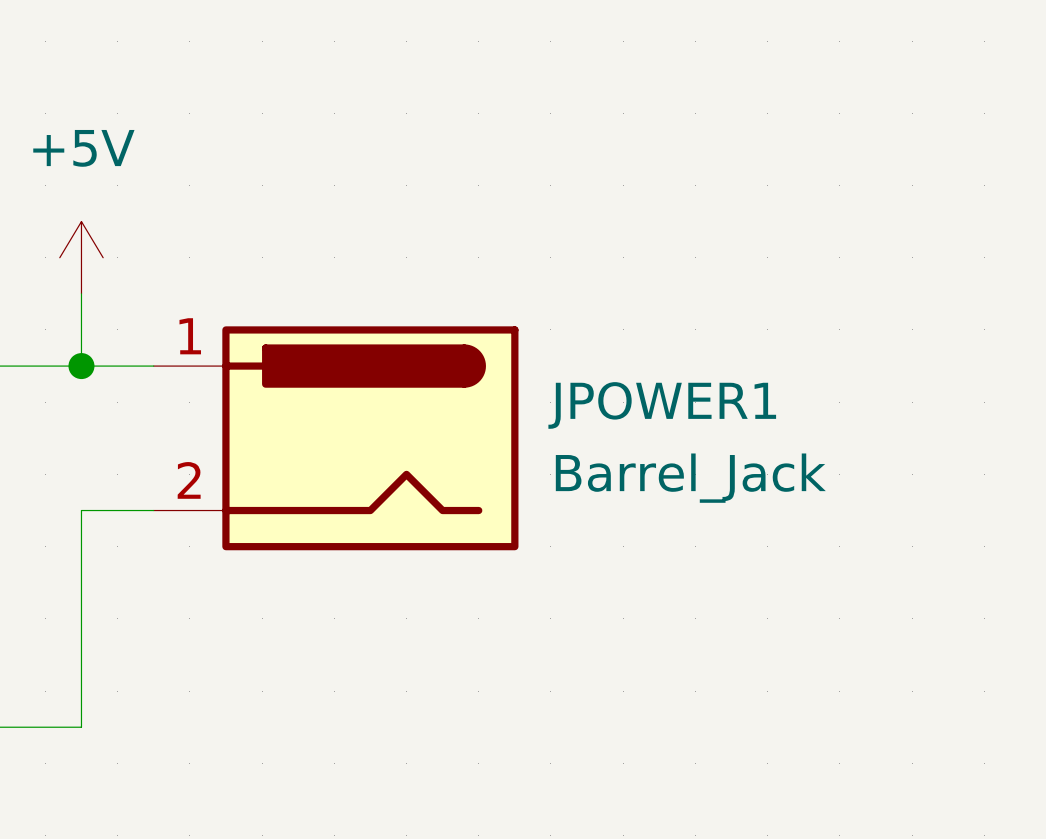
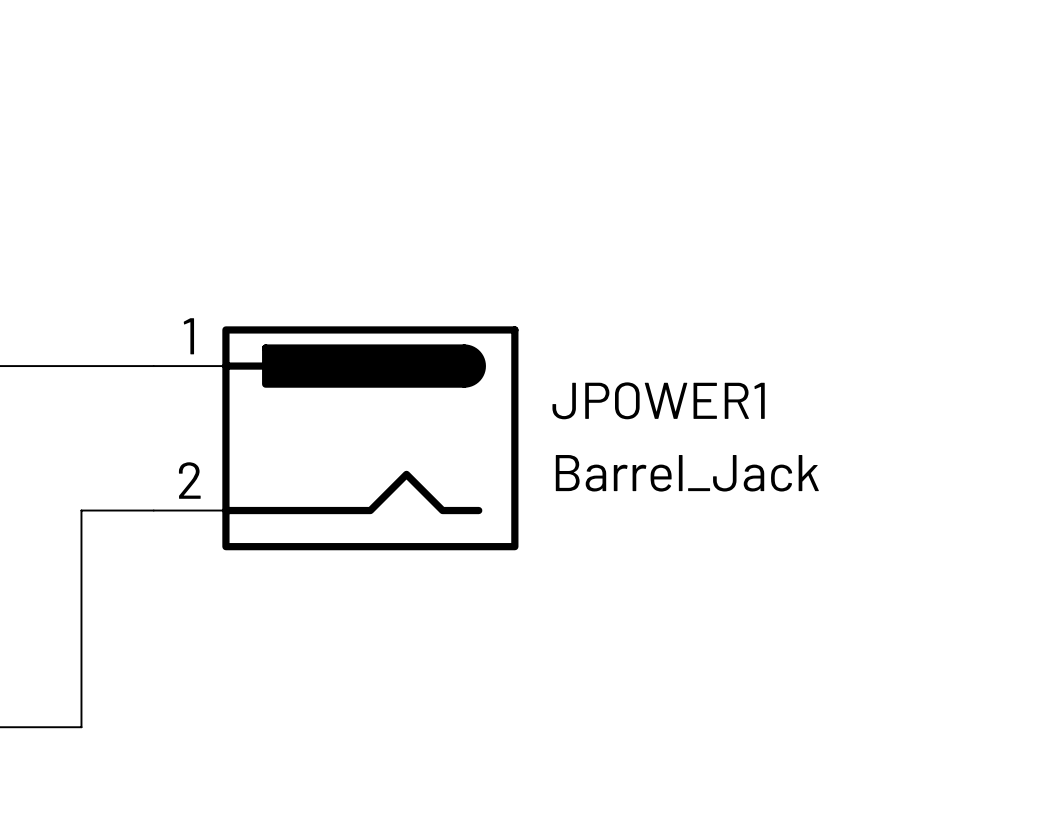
power symbol: +5V (81, 257) -> none
wire: (81, 293) (81, 366) -> none
junction: (81, 366) -> none

